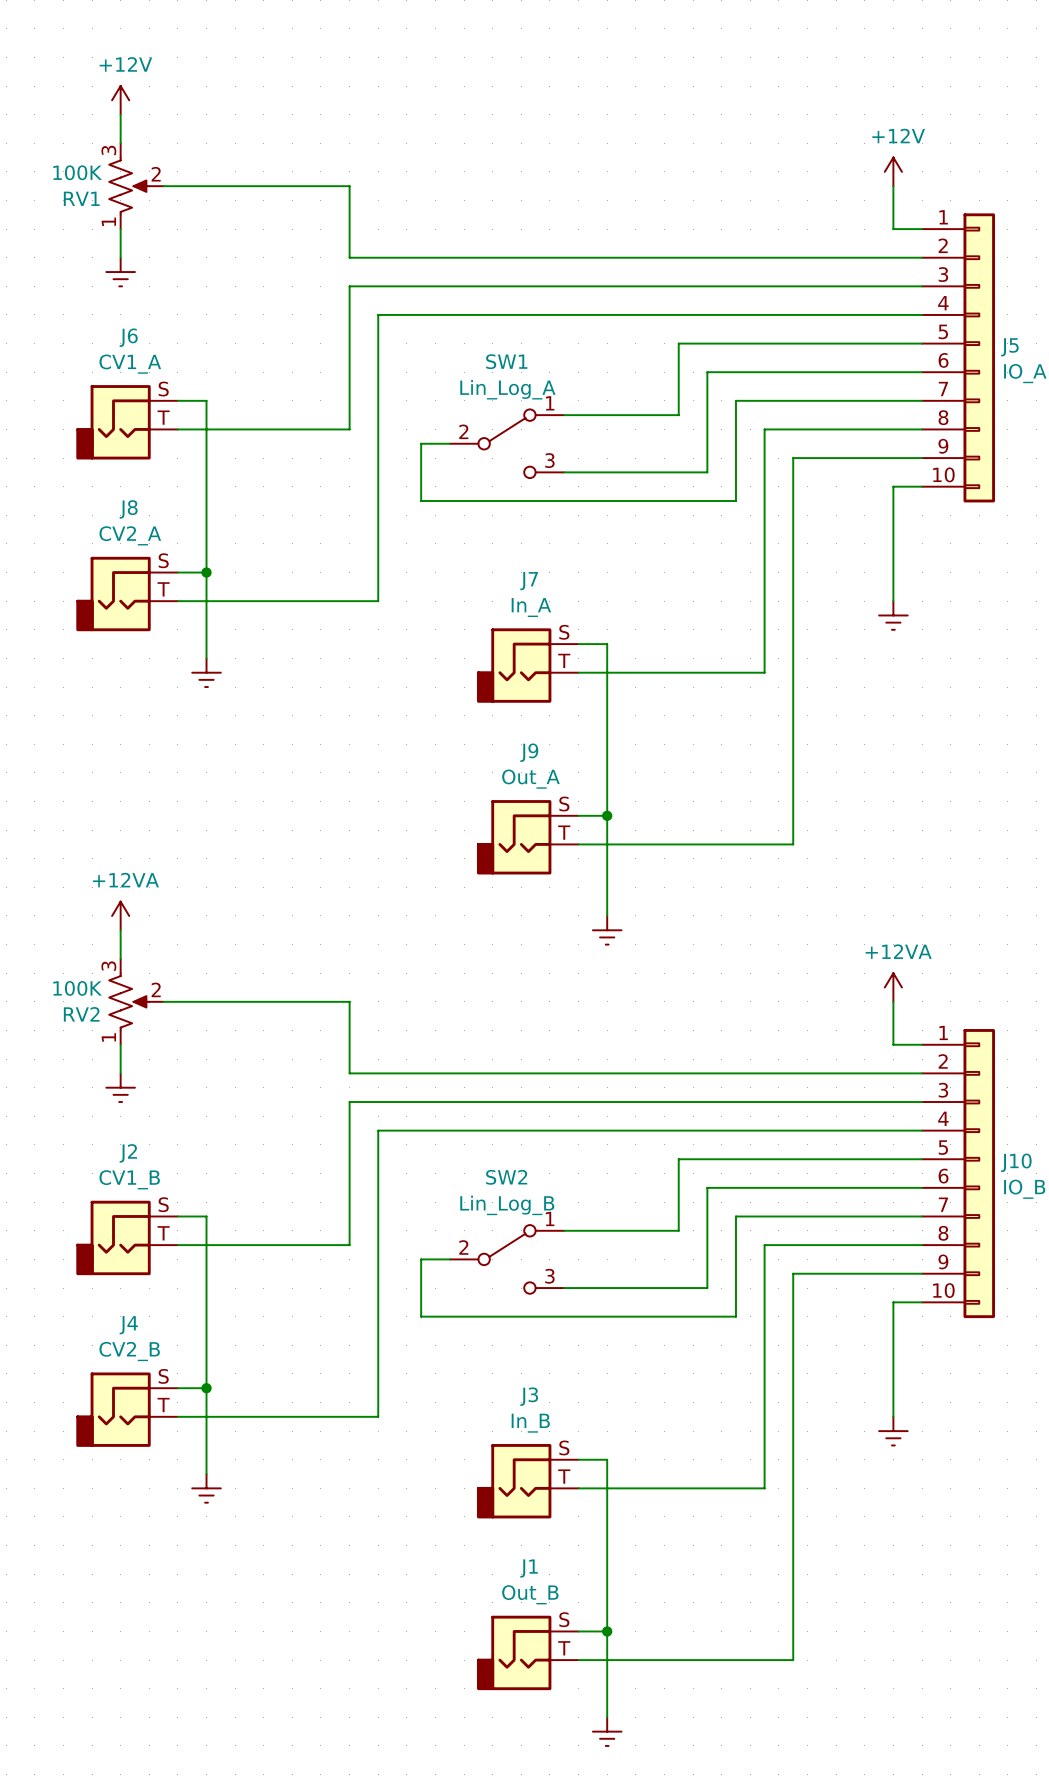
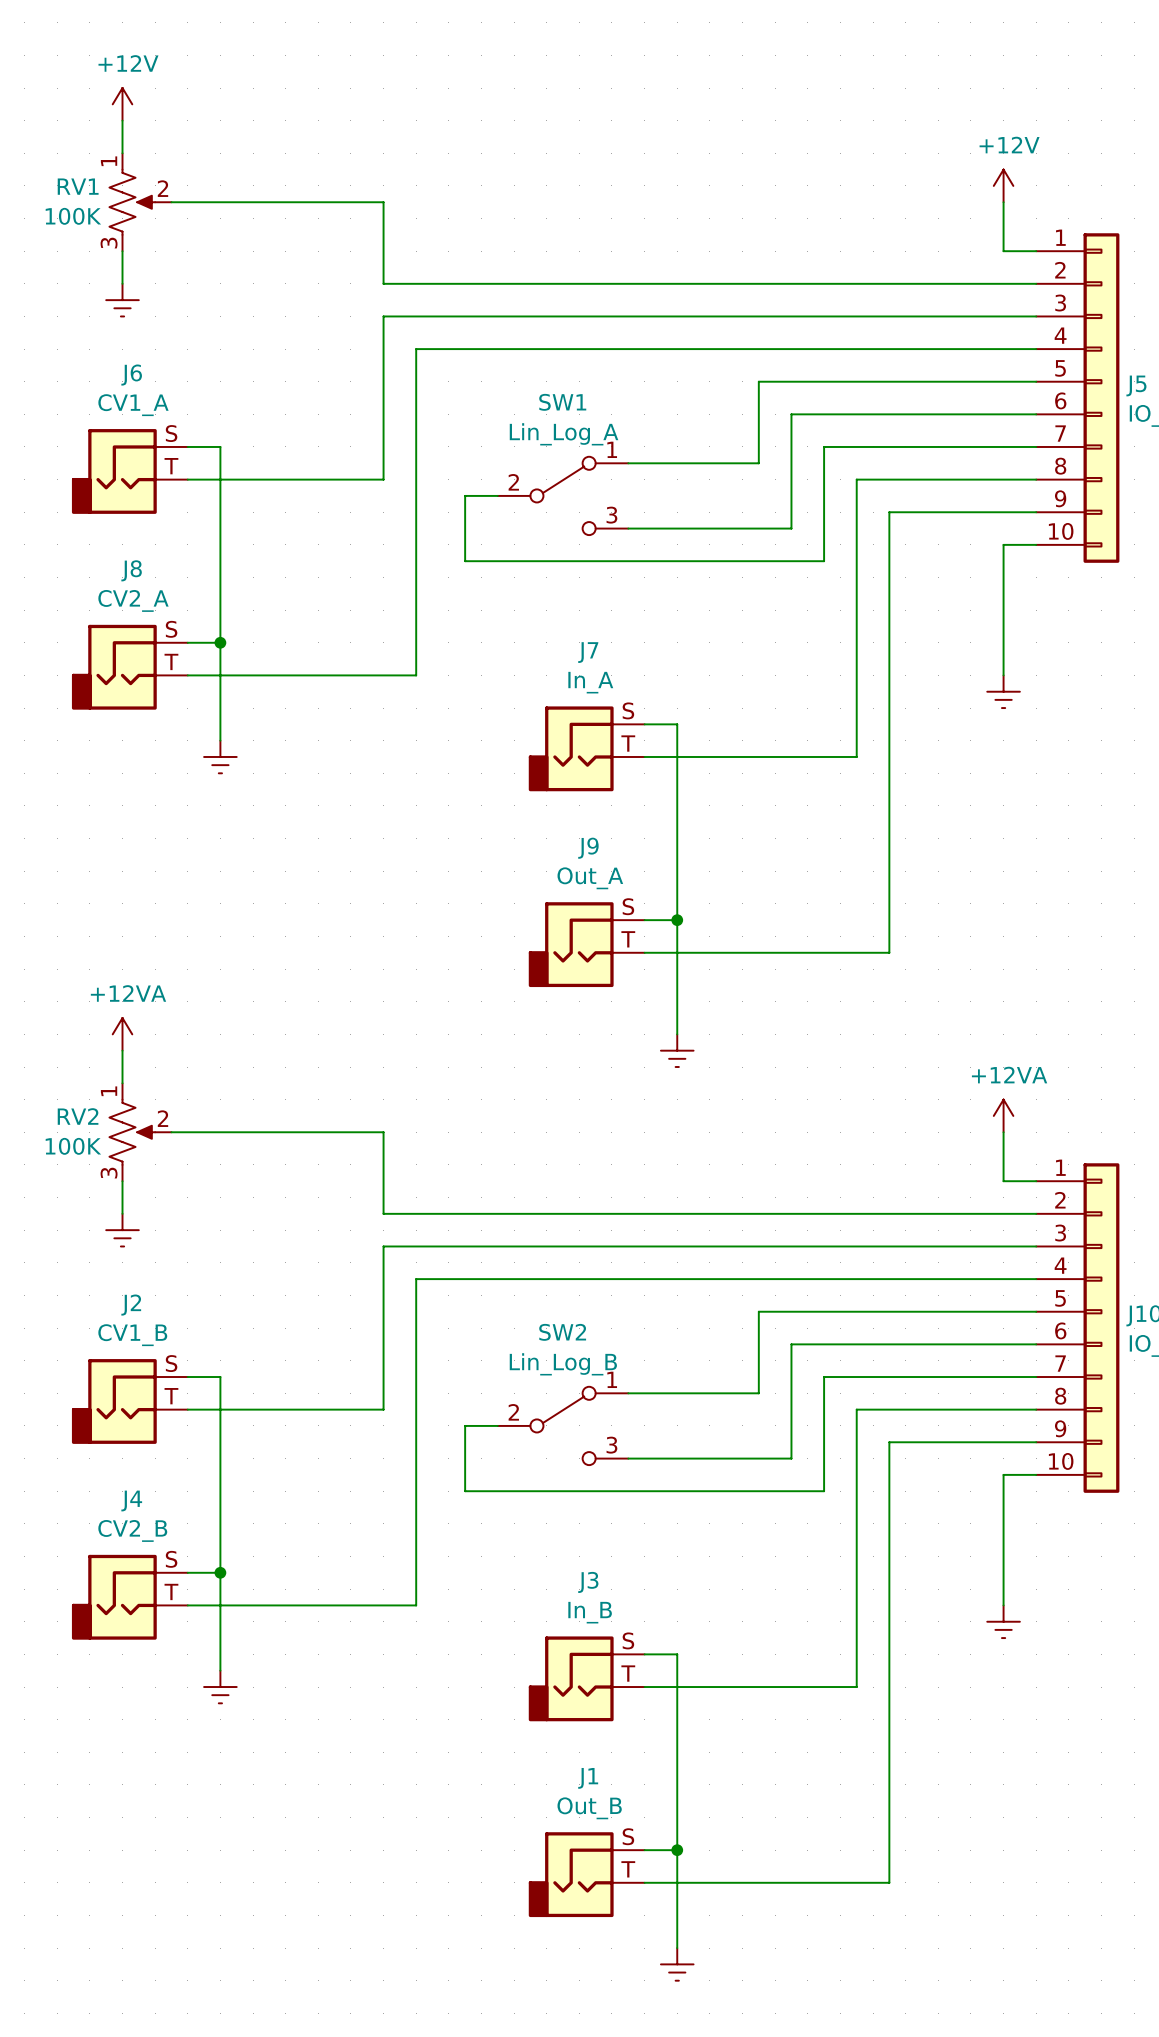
RV1 flip: as is (129, 186) -> up-down (132, 202)
RV2 flip: as is (129, 1001) -> up-down (132, 1132)

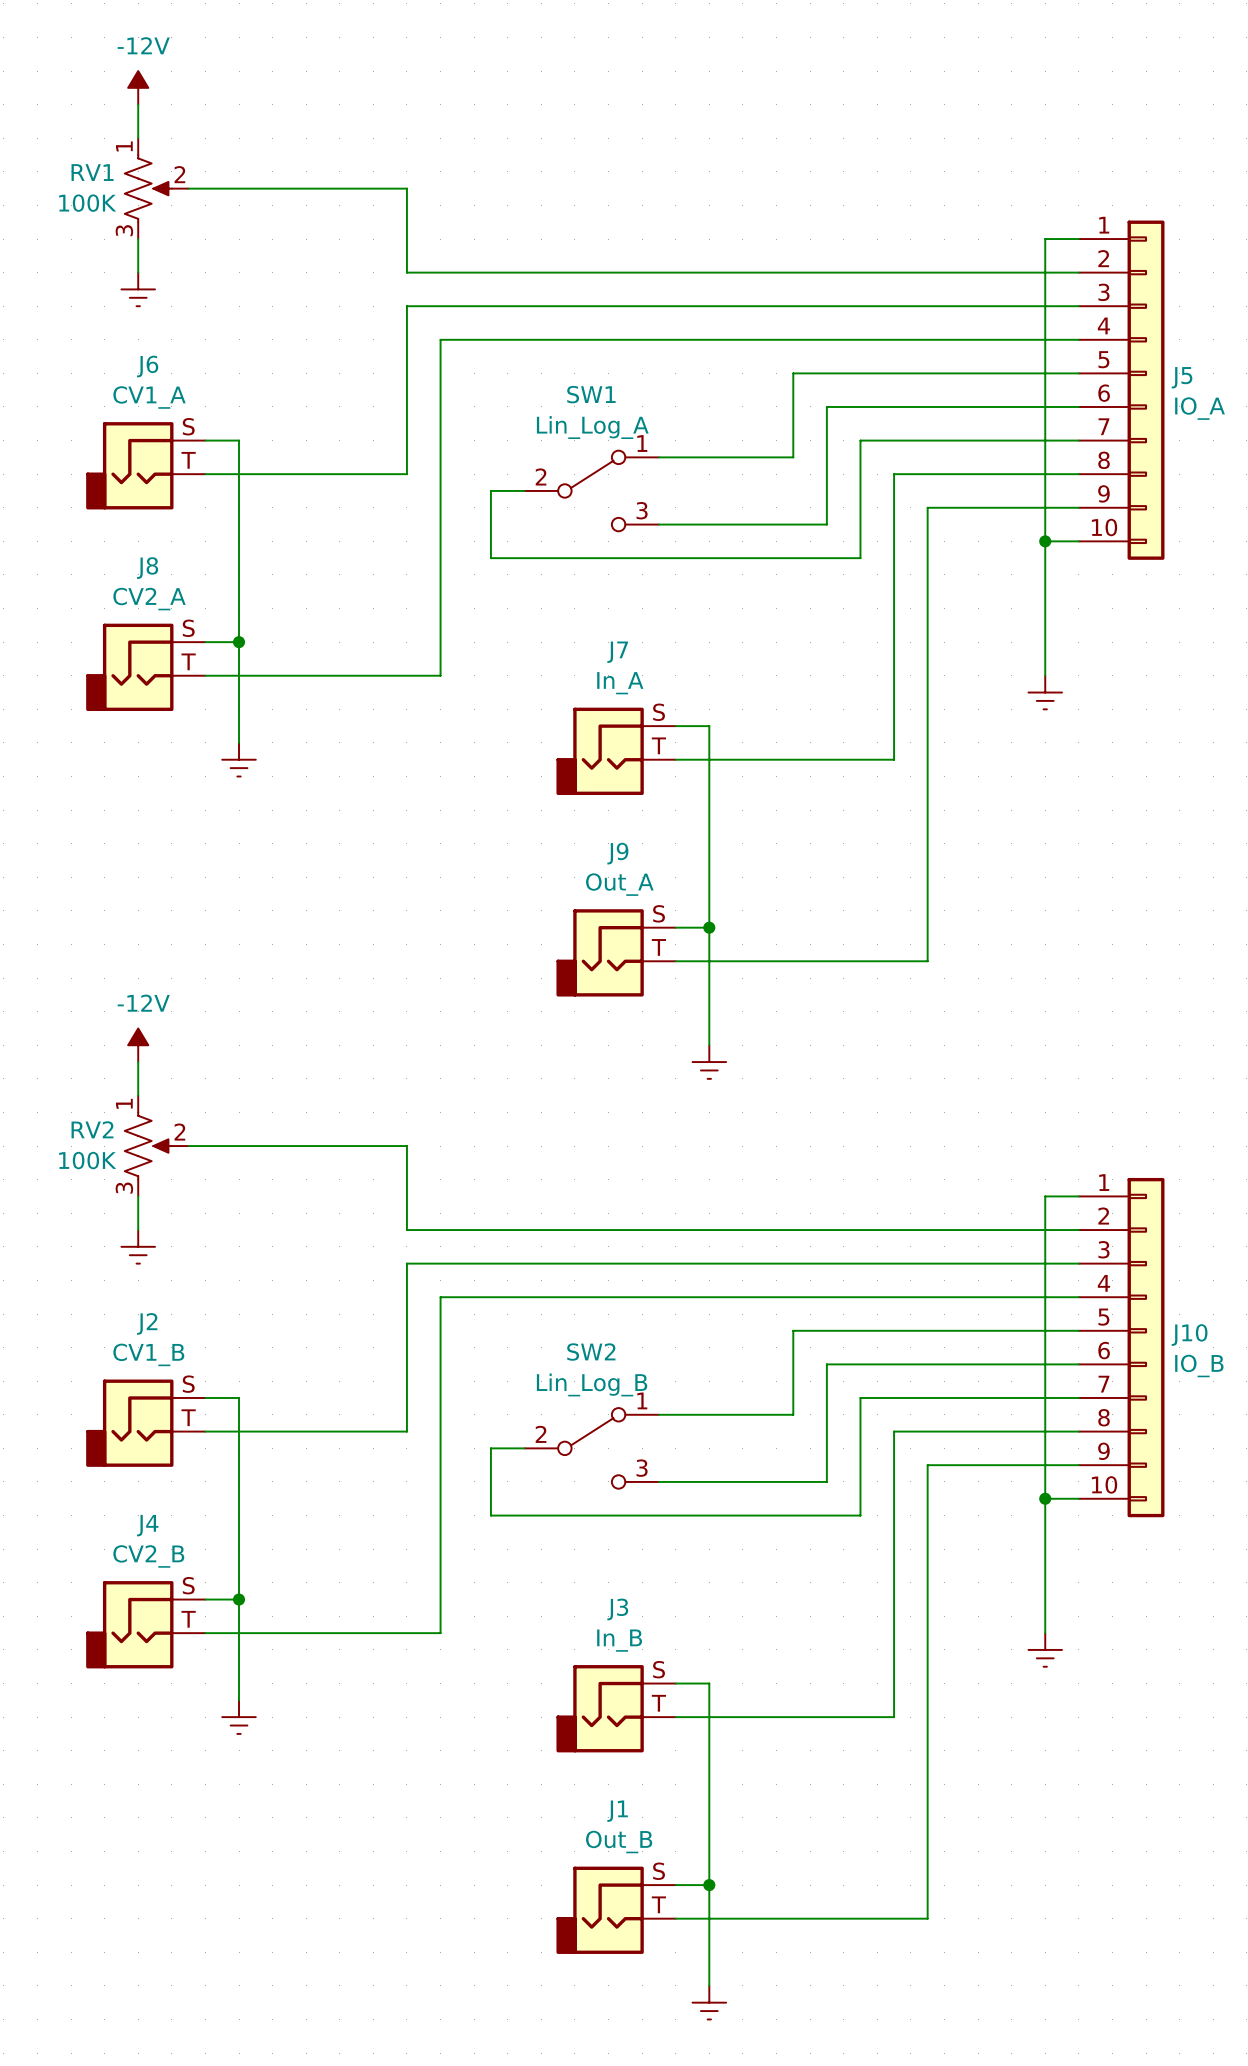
power symbol: +12V (122, 104) -> -12V (138, 87)
power symbol: +12V (1003, 185) -> none
wire: (1003, 202) (1003, 251) -> (1045, 541) (1045, 239)
junction: none -> (1045, 541)
power symbol: +12VA (122, 1034) -> -12V (138, 1045)
power symbol: +12VA (1003, 1115) -> none
wire: (1003, 1132) (1003, 1181) -> (1045, 1498) (1045, 1196)
junction: none -> (1045, 1498)

